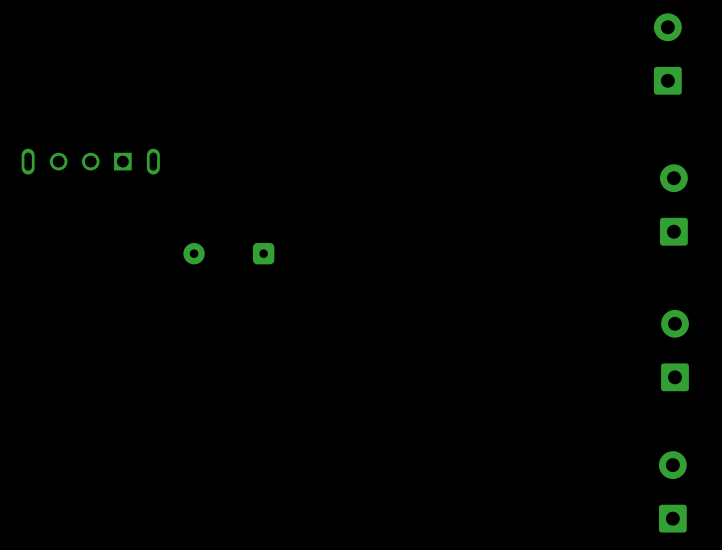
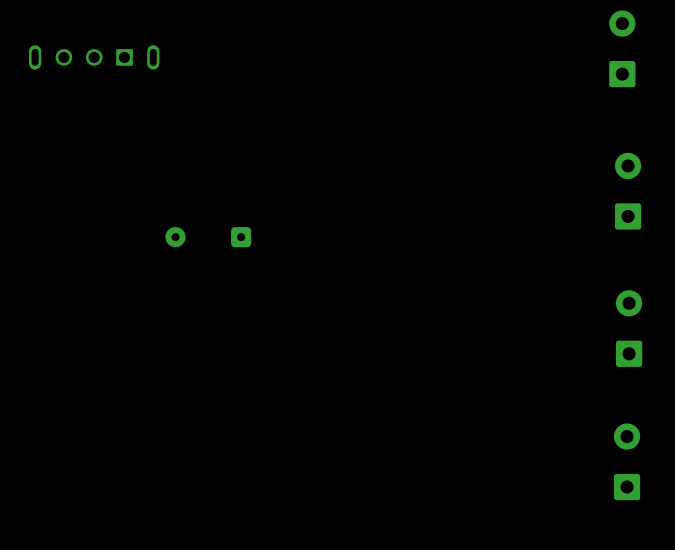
part position: (90, 161) -> (94, 57)

